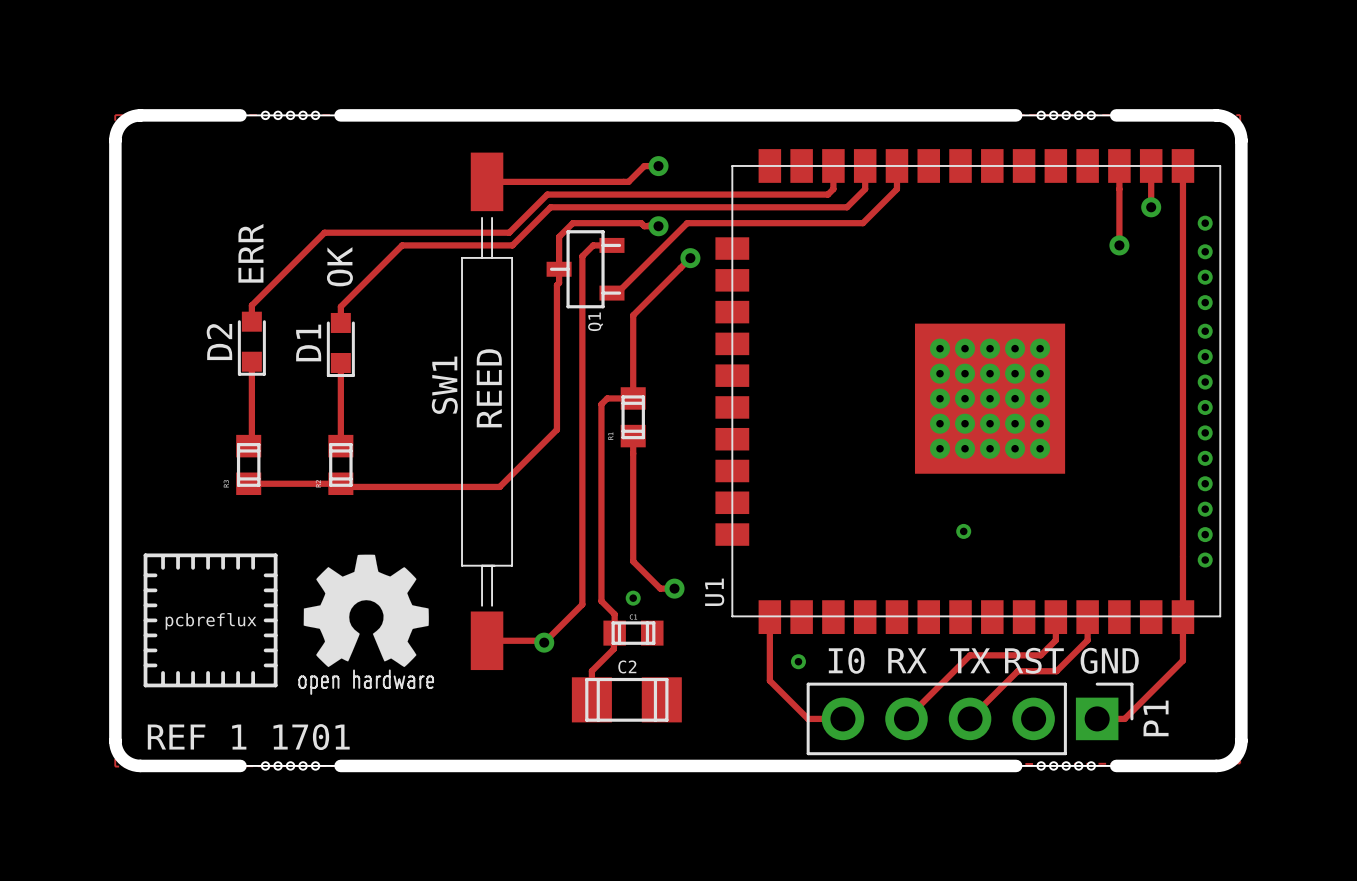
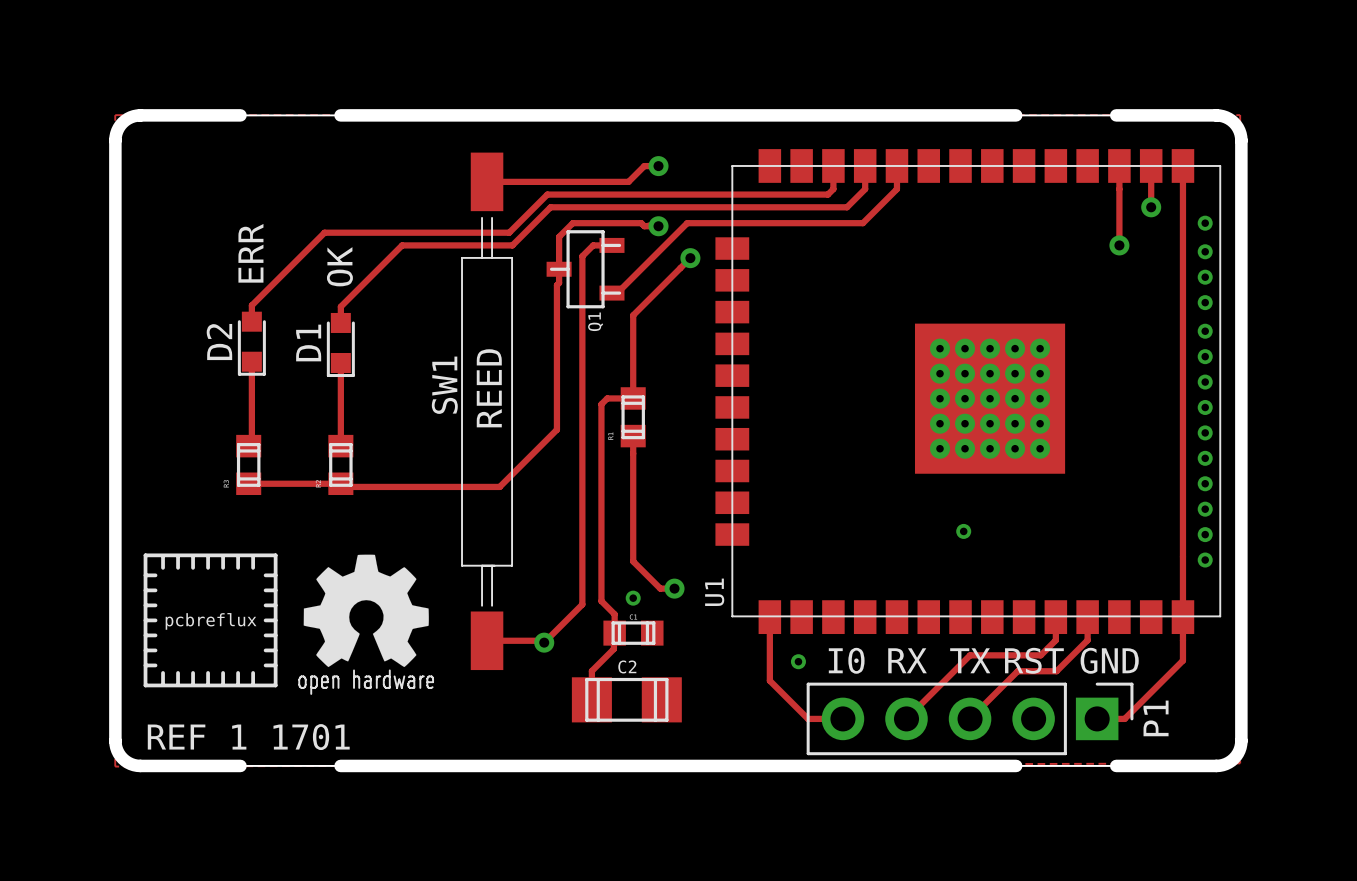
part: (290, 115) -> none
part: (1066, 115) -> none
part: (290, 765) -> none
part: (1066, 765) -> none

